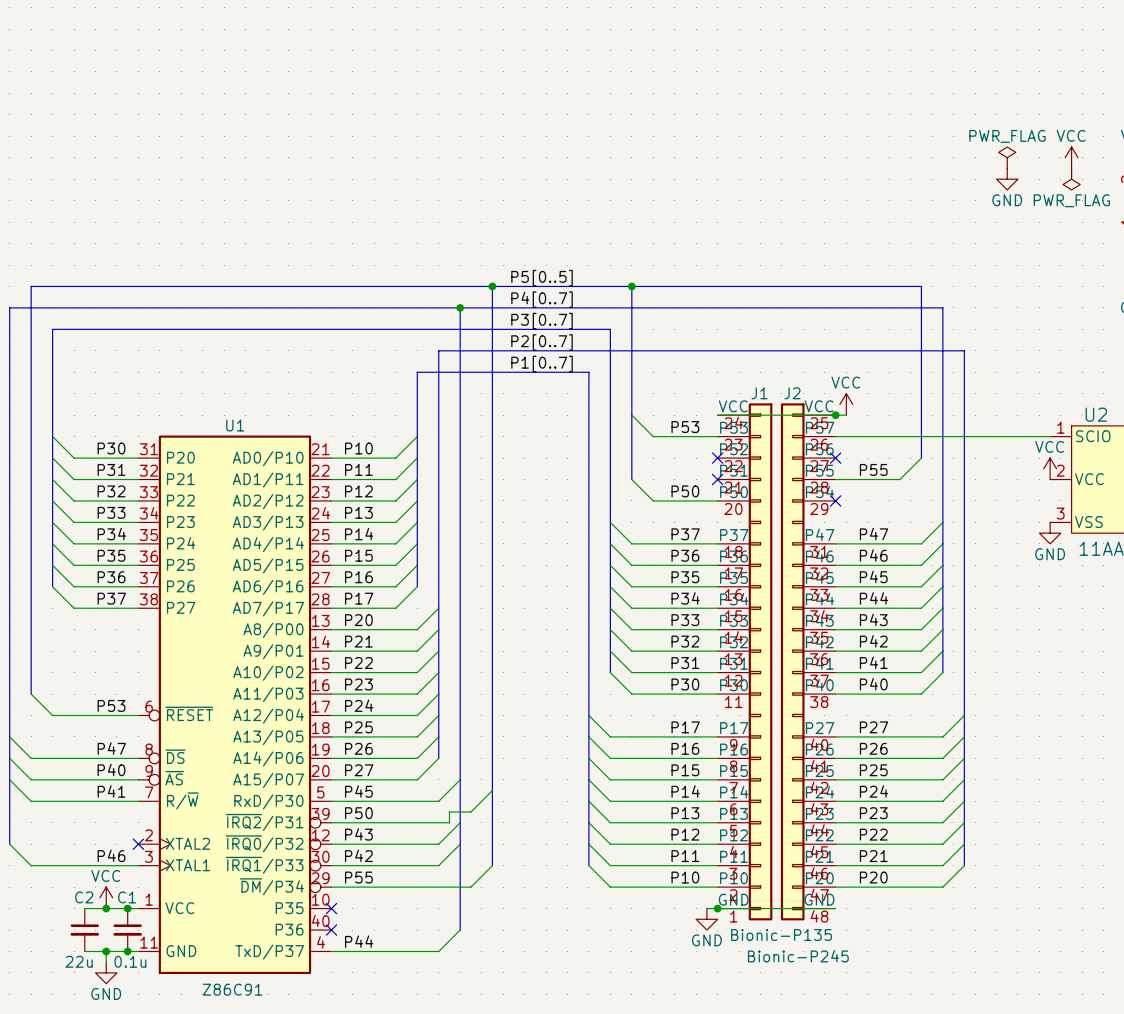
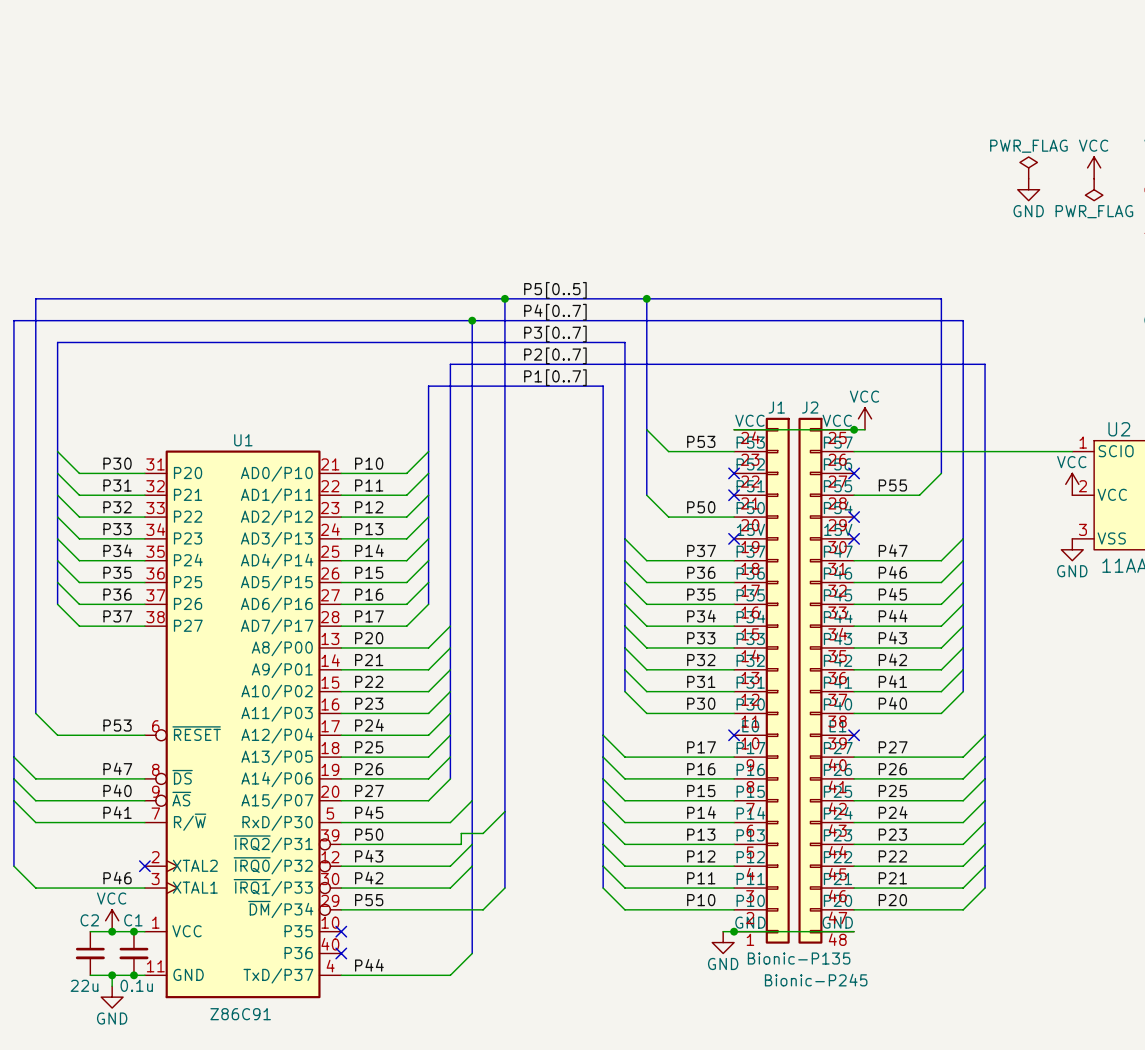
J1 symbol: [717, 403, 773, 921] -> [734, 417, 790, 944]
J2 symbol: [780, 403, 836, 921] -> [798, 417, 855, 944]
no-connect mark: none -> (734, 538)
no-connect mark: none -> (854, 538)
no-connect mark: none -> (734, 735)
no-connect mark: none -> (854, 735)

